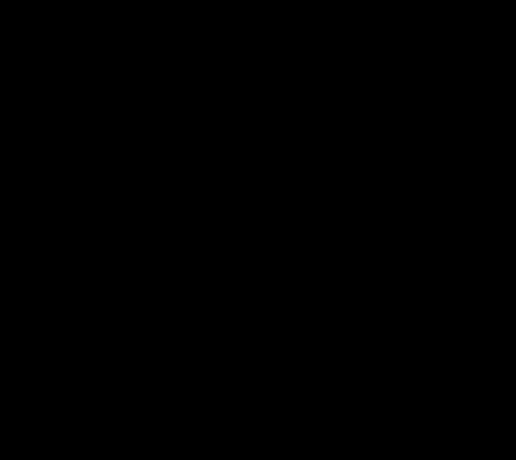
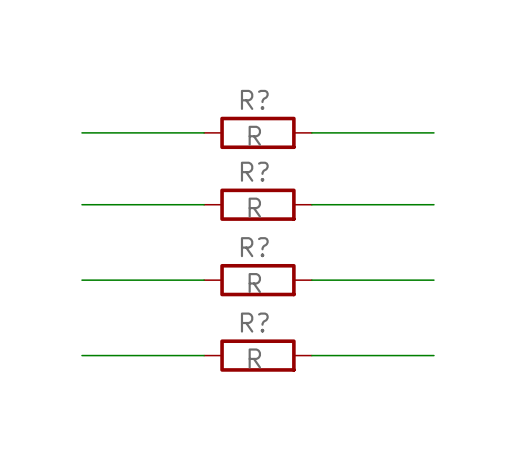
wire: none -> (81, 132) (204, 132)
R?: none -> R (257, 132)
wire: none -> (311, 132) (433, 132)
wire: none -> (81, 204) (204, 204)
R?: none -> R (257, 204)
wire: none -> (311, 204) (433, 204)
wire: none -> (81, 280) (204, 280)
R?: none -> R (257, 280)
wire: none -> (311, 280) (433, 280)
wire: none -> (81, 355) (204, 355)
R?: none -> R (257, 355)
wire: none -> (311, 355) (433, 355)

